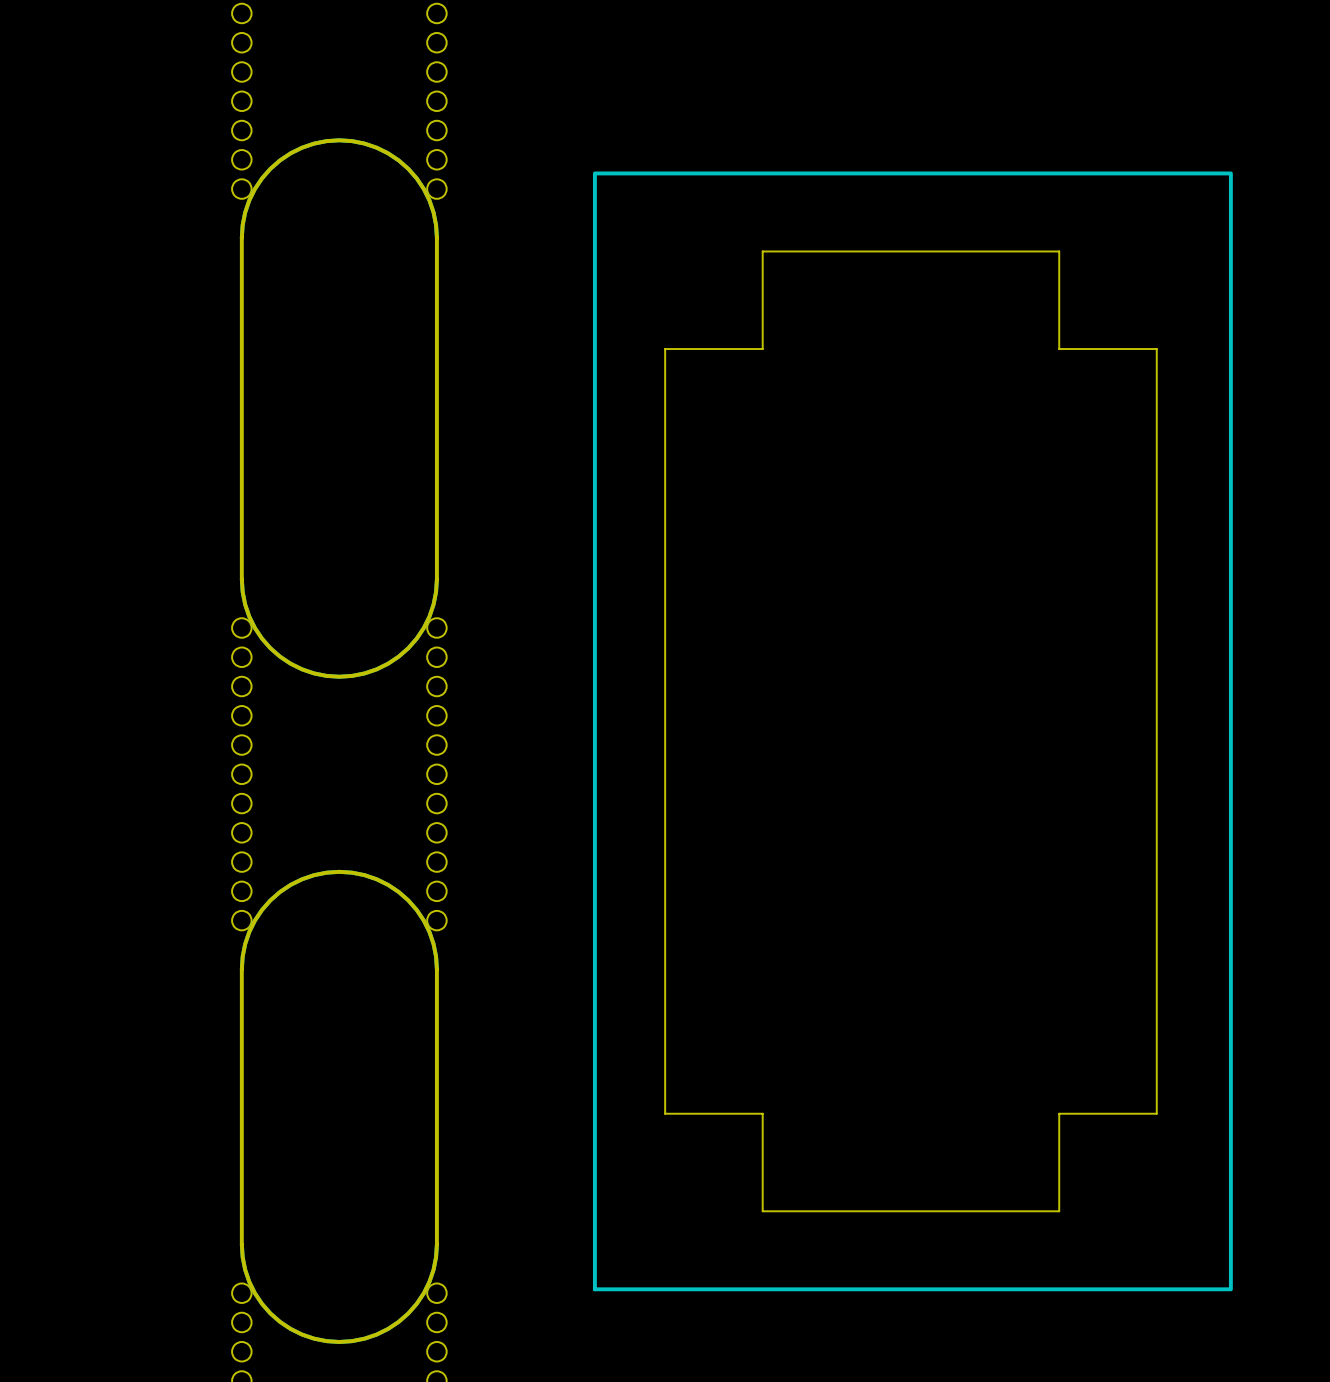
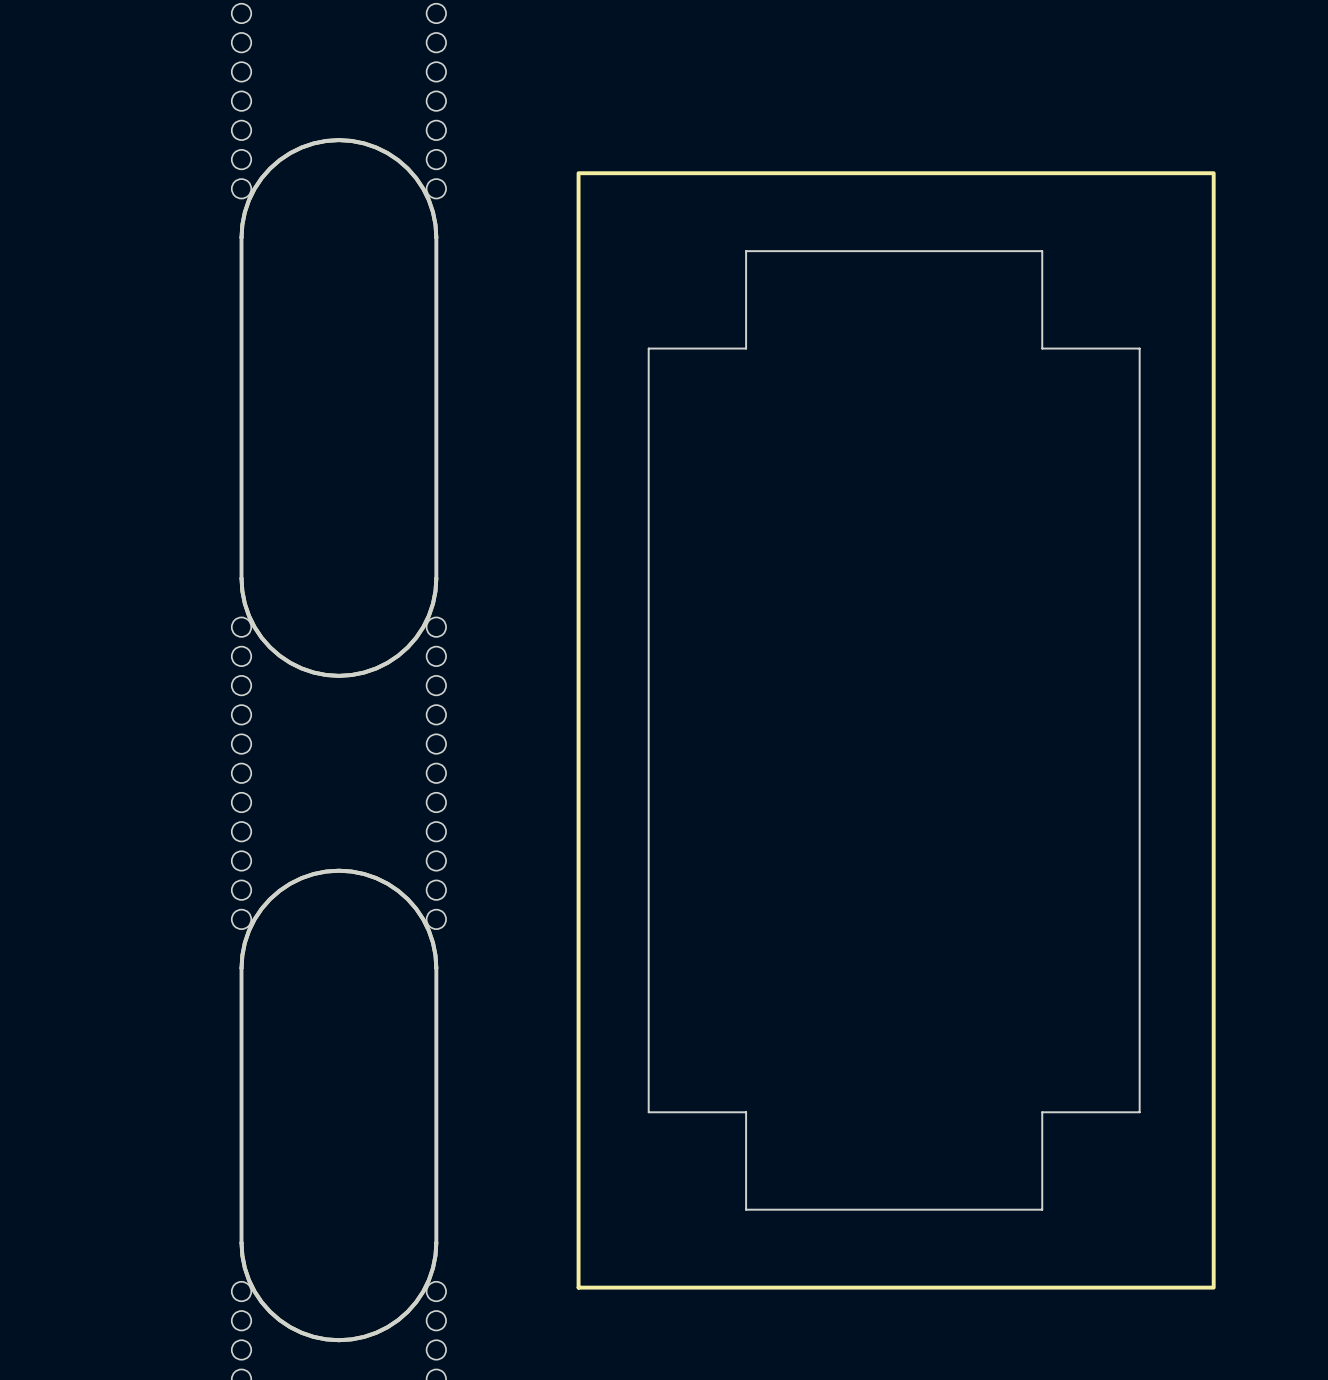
drawing position: (912, 731) -> (896, 730)

